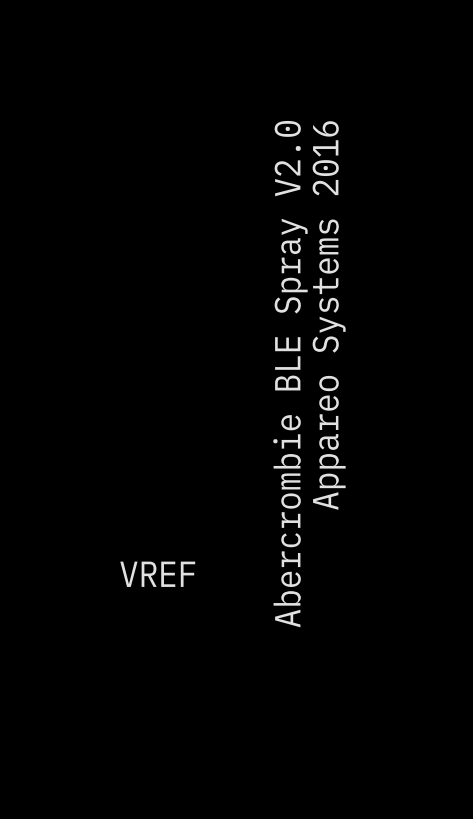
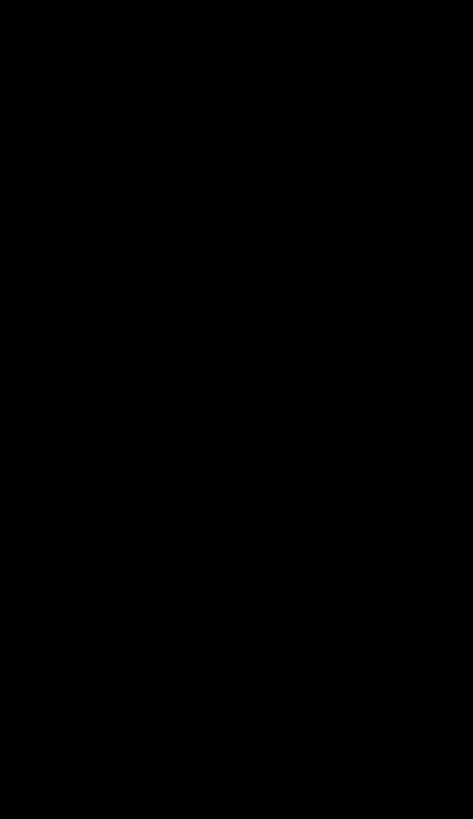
text: Appareo Systems 2016 (329, 315) -> none
text: Abercrombie BLE Spray V2.0 (290, 374) -> none
text: VREF (157, 574) -> none

